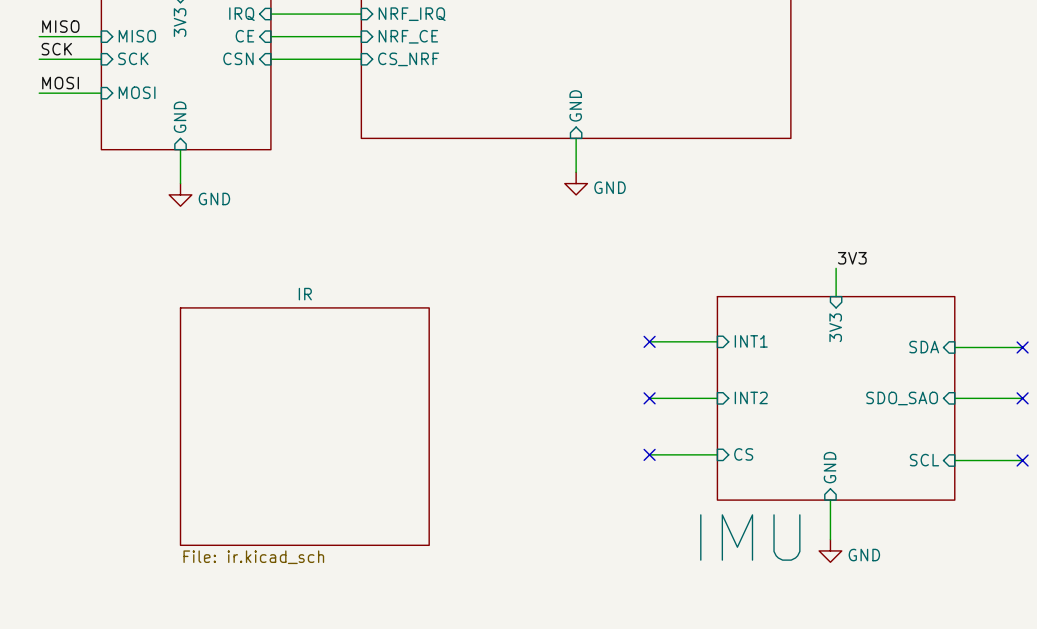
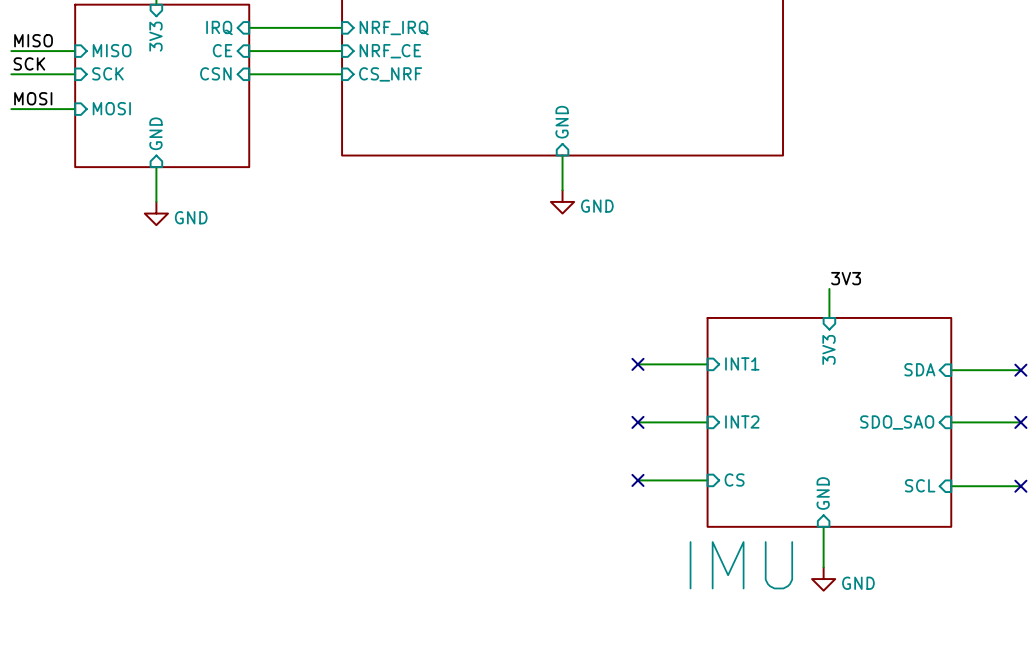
sheet IR: File: ir.kicad_sch (304, 426) -> none

